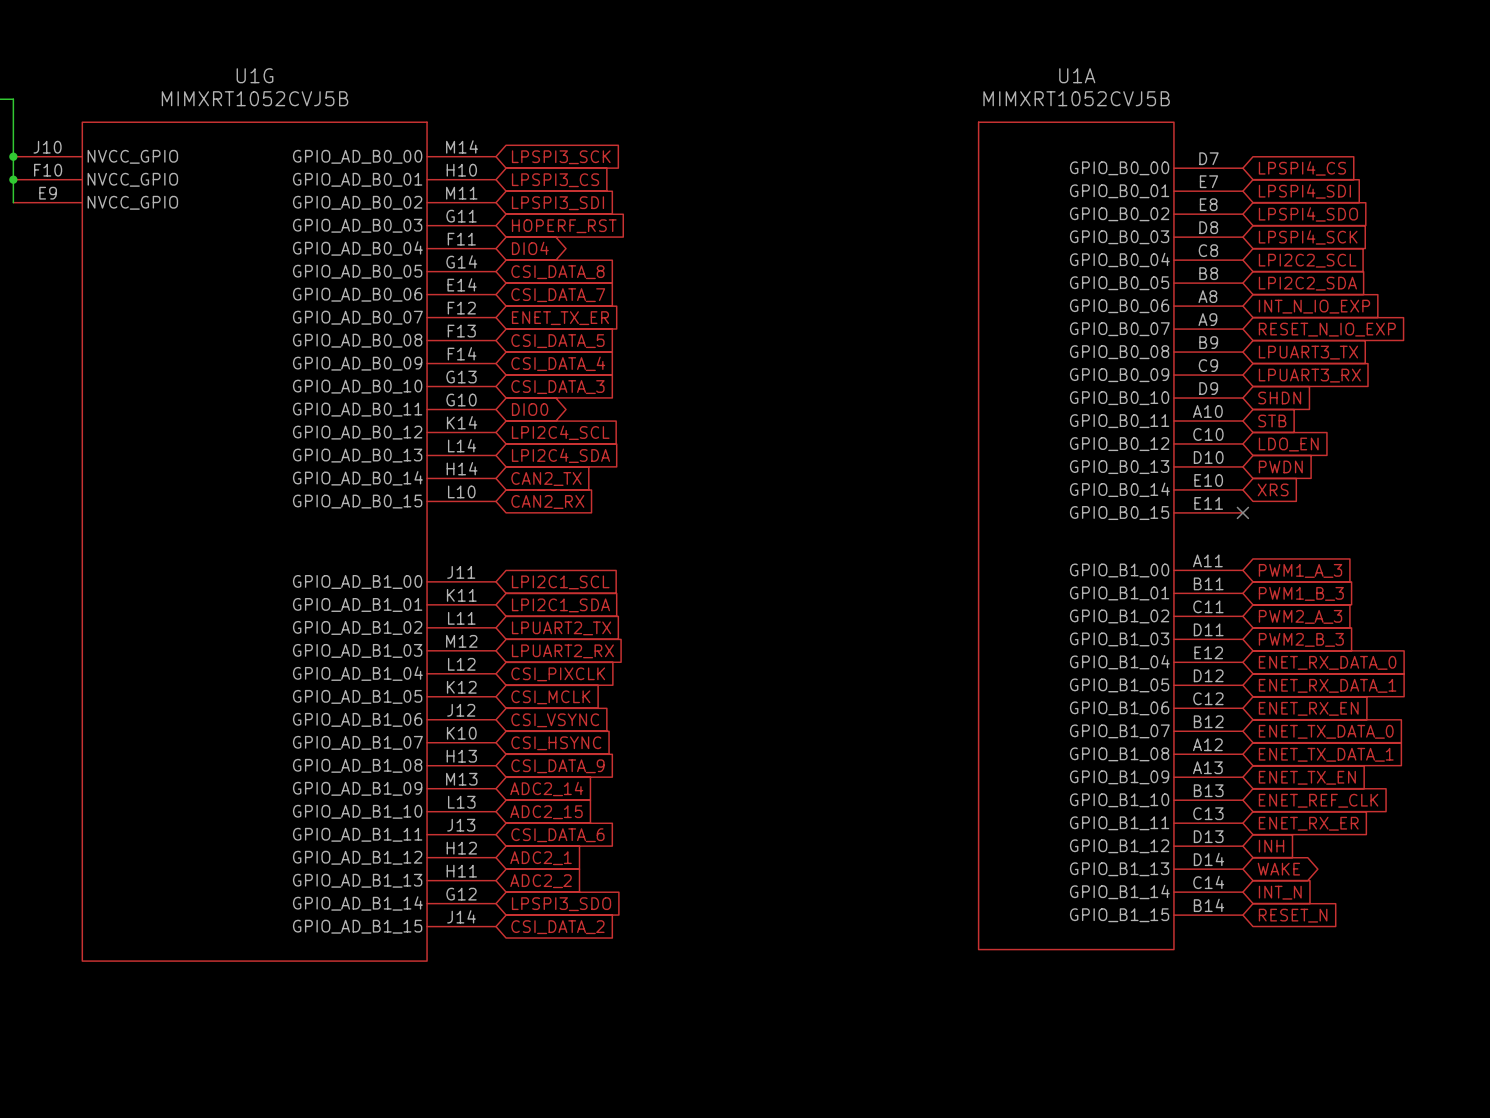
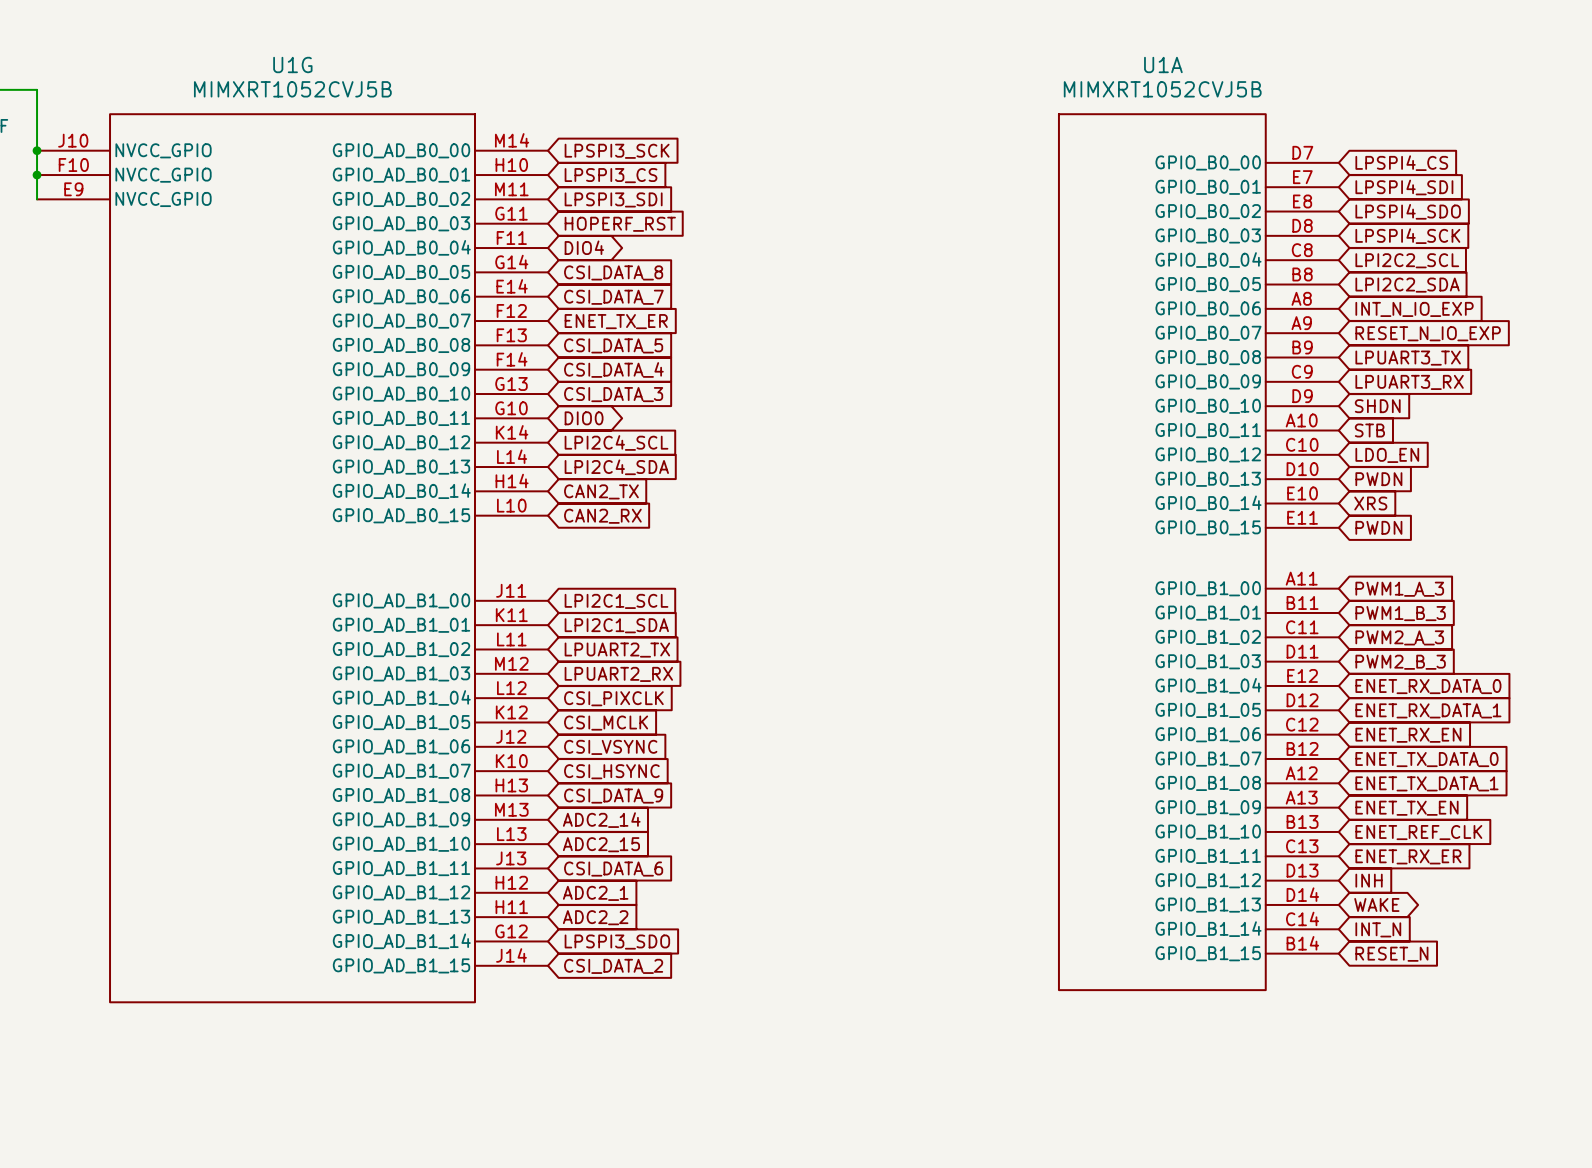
no-connect mark: (1242, 512) -> none
global label: none -> PWDN (1378, 527)

